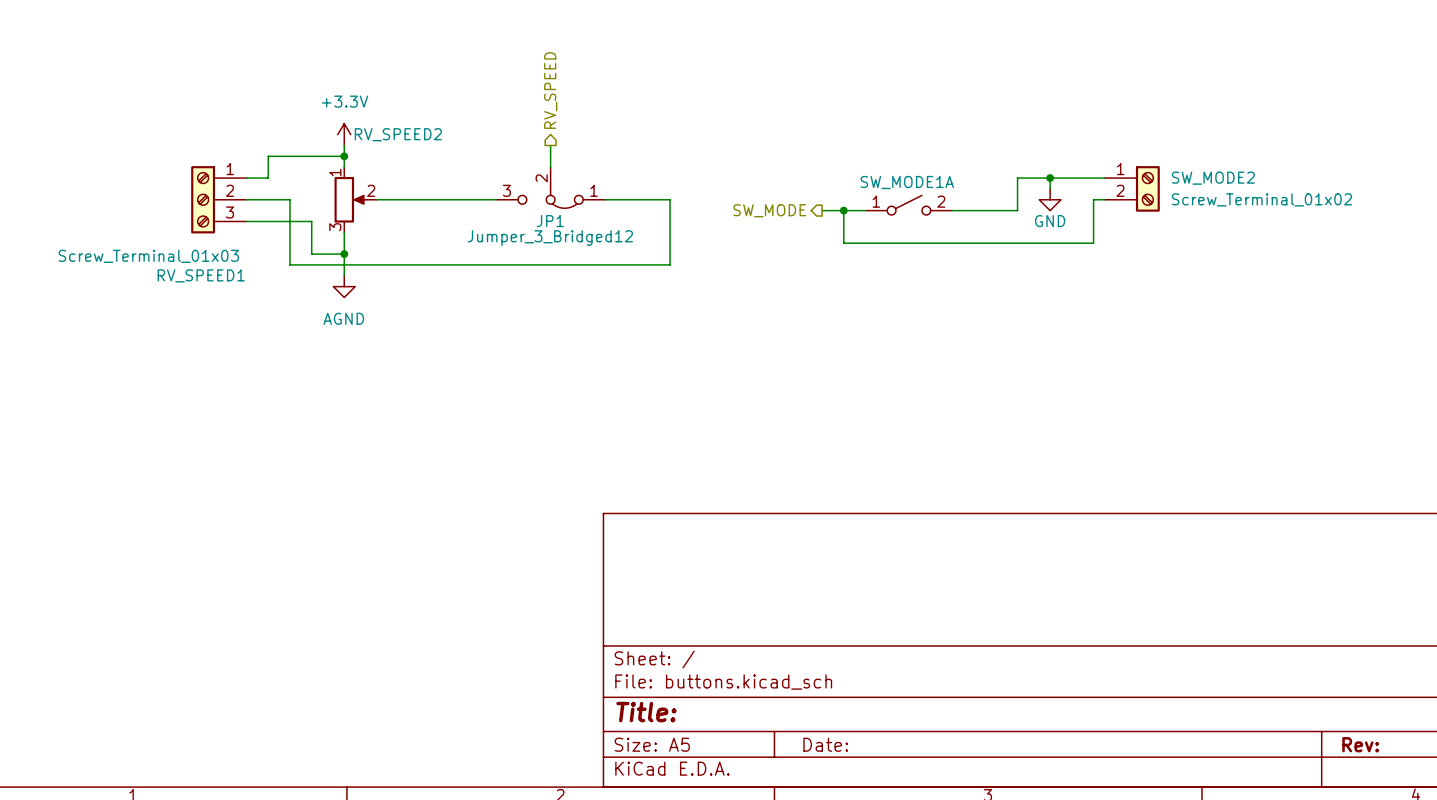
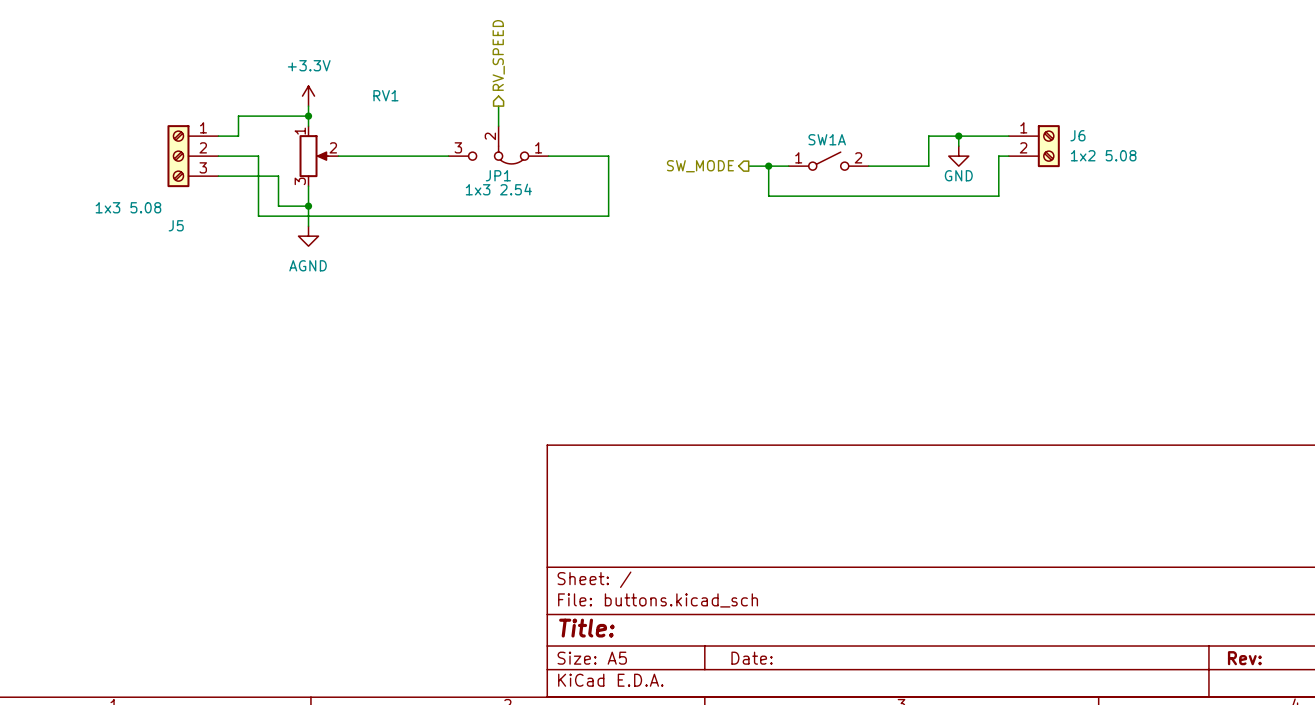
RV_SPEED2 name: RV_SPEED2 (398, 134) -> RV1 (385, 95)
SW_MODE2 name: SW_MODE2 (1213, 178) -> J6 (1077, 135)
SW_MODE1A name: SW_MODE1A (907, 182) -> SW1A (827, 139)
SW_MODE2 value: Screw_Terminal_01x02 (1261, 199) -> 1x2 5.08 (1103, 155)
JP1 value: Jumper_3_Bridged12 (550, 238) -> 1x3 2.54 (498, 189)
RV_SPEED1 value: Screw_Terminal_01x03 (148, 256) -> 1x3 5.08 (128, 207)
RV_SPEED1 name: RV_SPEED1 (201, 275) -> J5 (176, 225)

